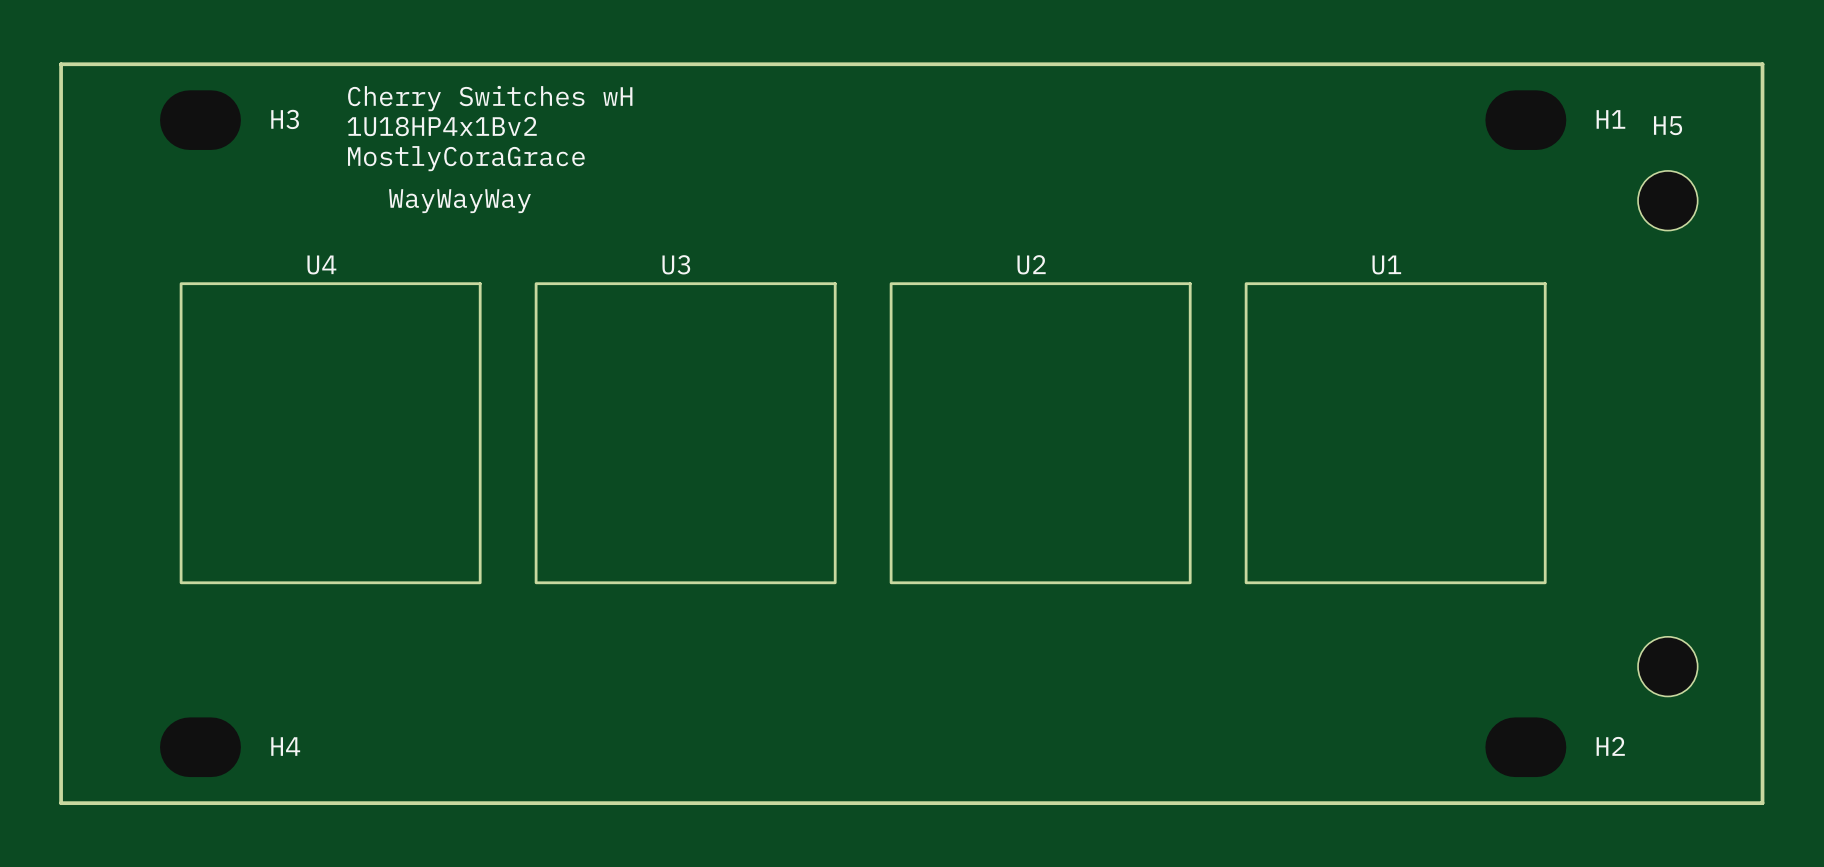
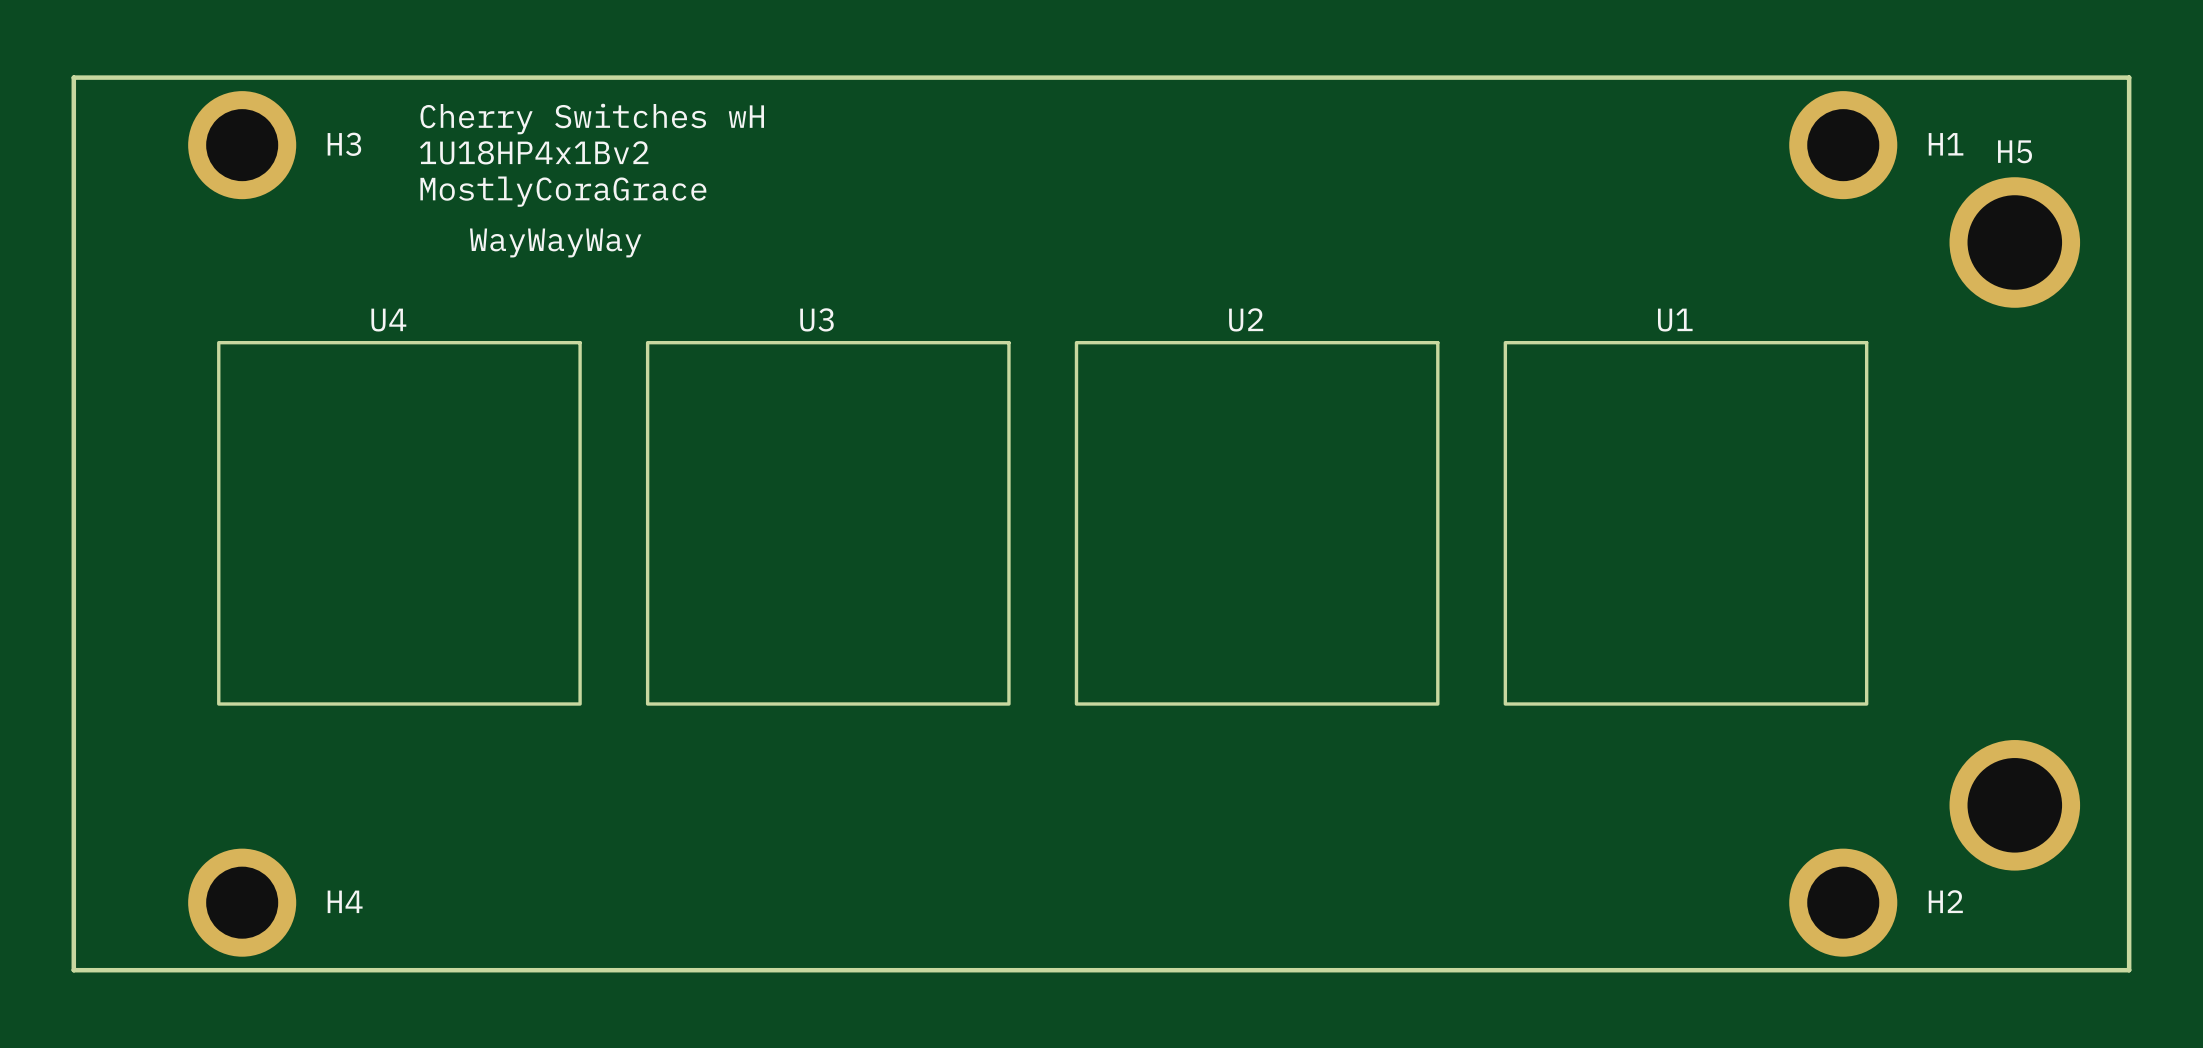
H3 footprint: [160, 90, 241, 150] -> [188, 91, 297, 200]
H1 footprint: [1485, 90, 1567, 150] -> [1789, 91, 1898, 200]
H5 footprint: [1638, 170, 1698, 697] -> [1949, 177, 2081, 871]
H4 footprint: [160, 717, 241, 778] -> [188, 848, 297, 957]
H2 footprint: [1485, 717, 1567, 778] -> [1789, 848, 1898, 957]

